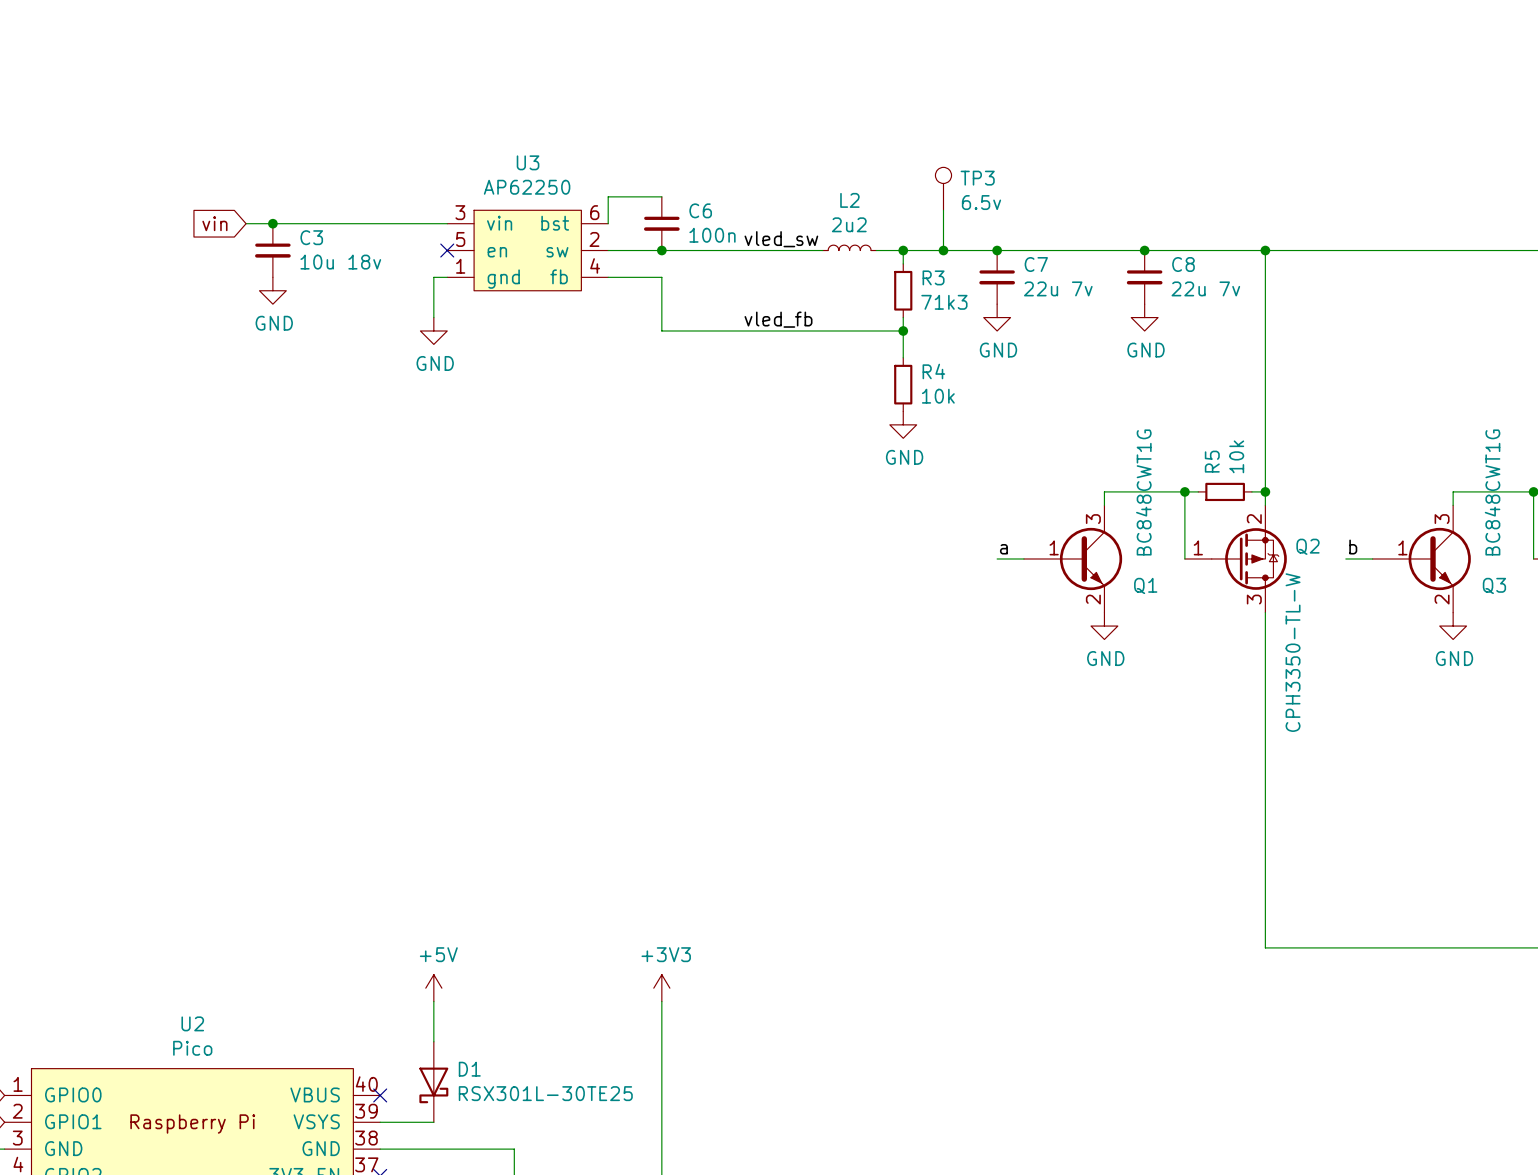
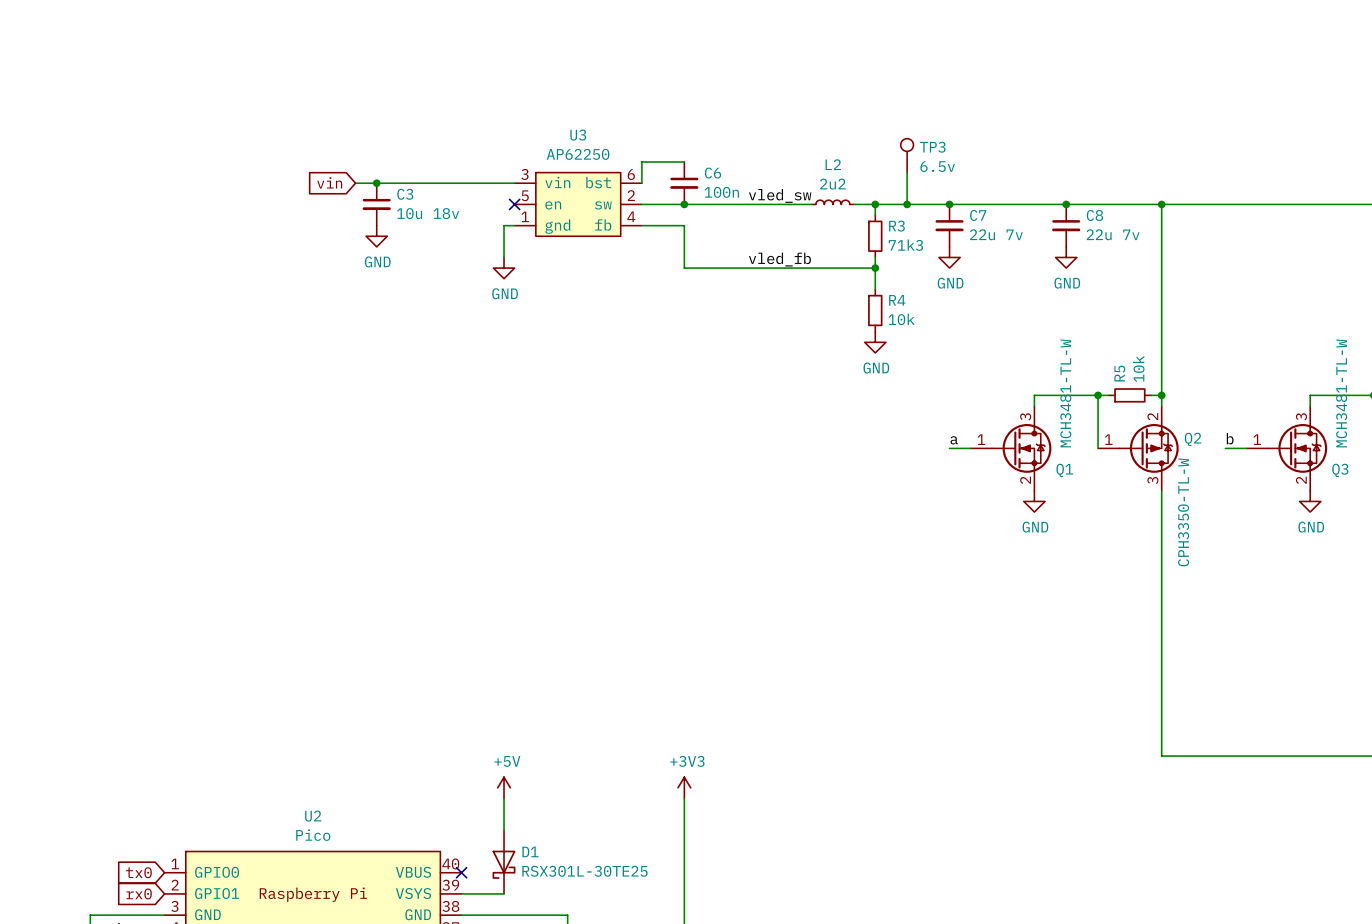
Q1 value: BC848CWT1G (1143, 492) -> MCH3481-TL-W (1065, 393)
Q3 value: BC848CWT1G (1492, 492) -> MCH3481-TL-W (1341, 393)
Q1 symbol: [1023, 505, 1123, 613] -> [970, 405, 1052, 491]
Q3 symbol: [1372, 505, 1471, 613] -> [1246, 405, 1328, 491]

